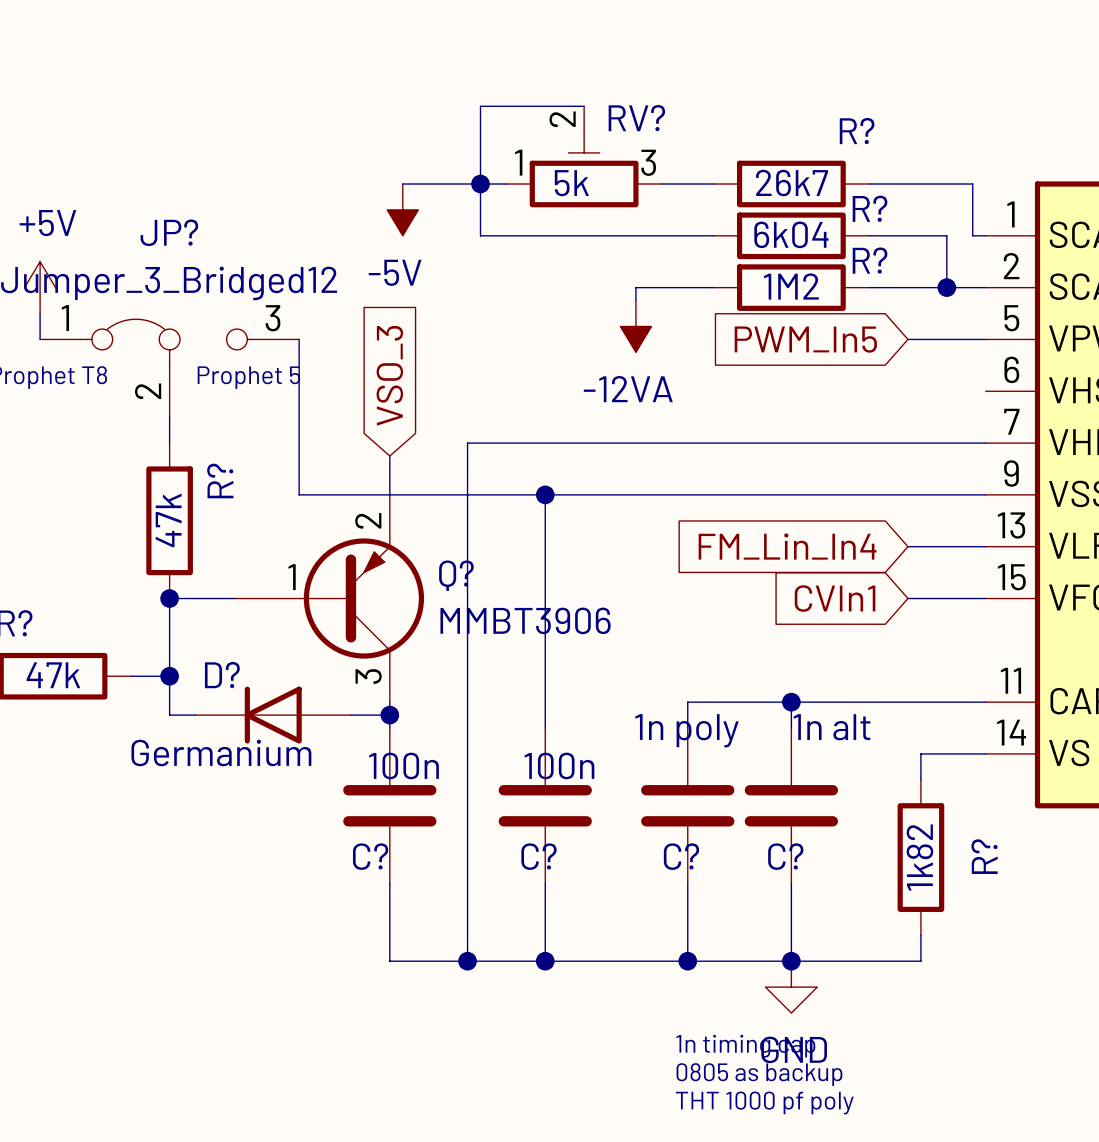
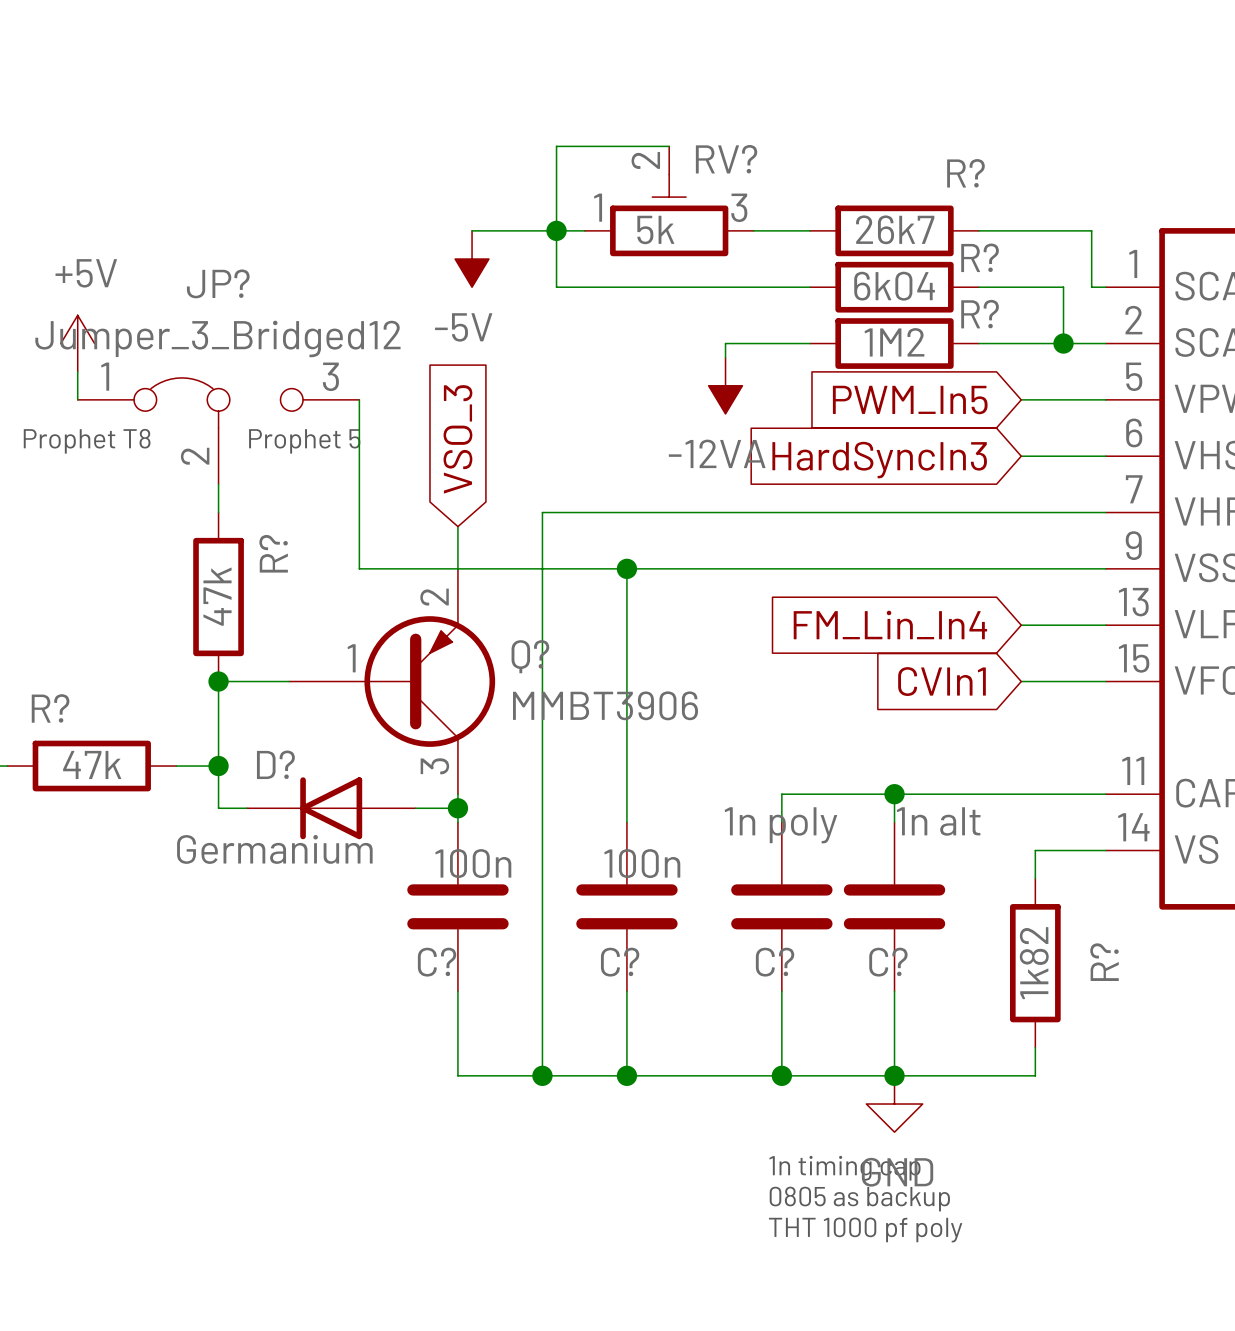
wire: none -> (1021, 456) (1105, 456)
global label: none -> HardSyncIn3 (879, 460)

